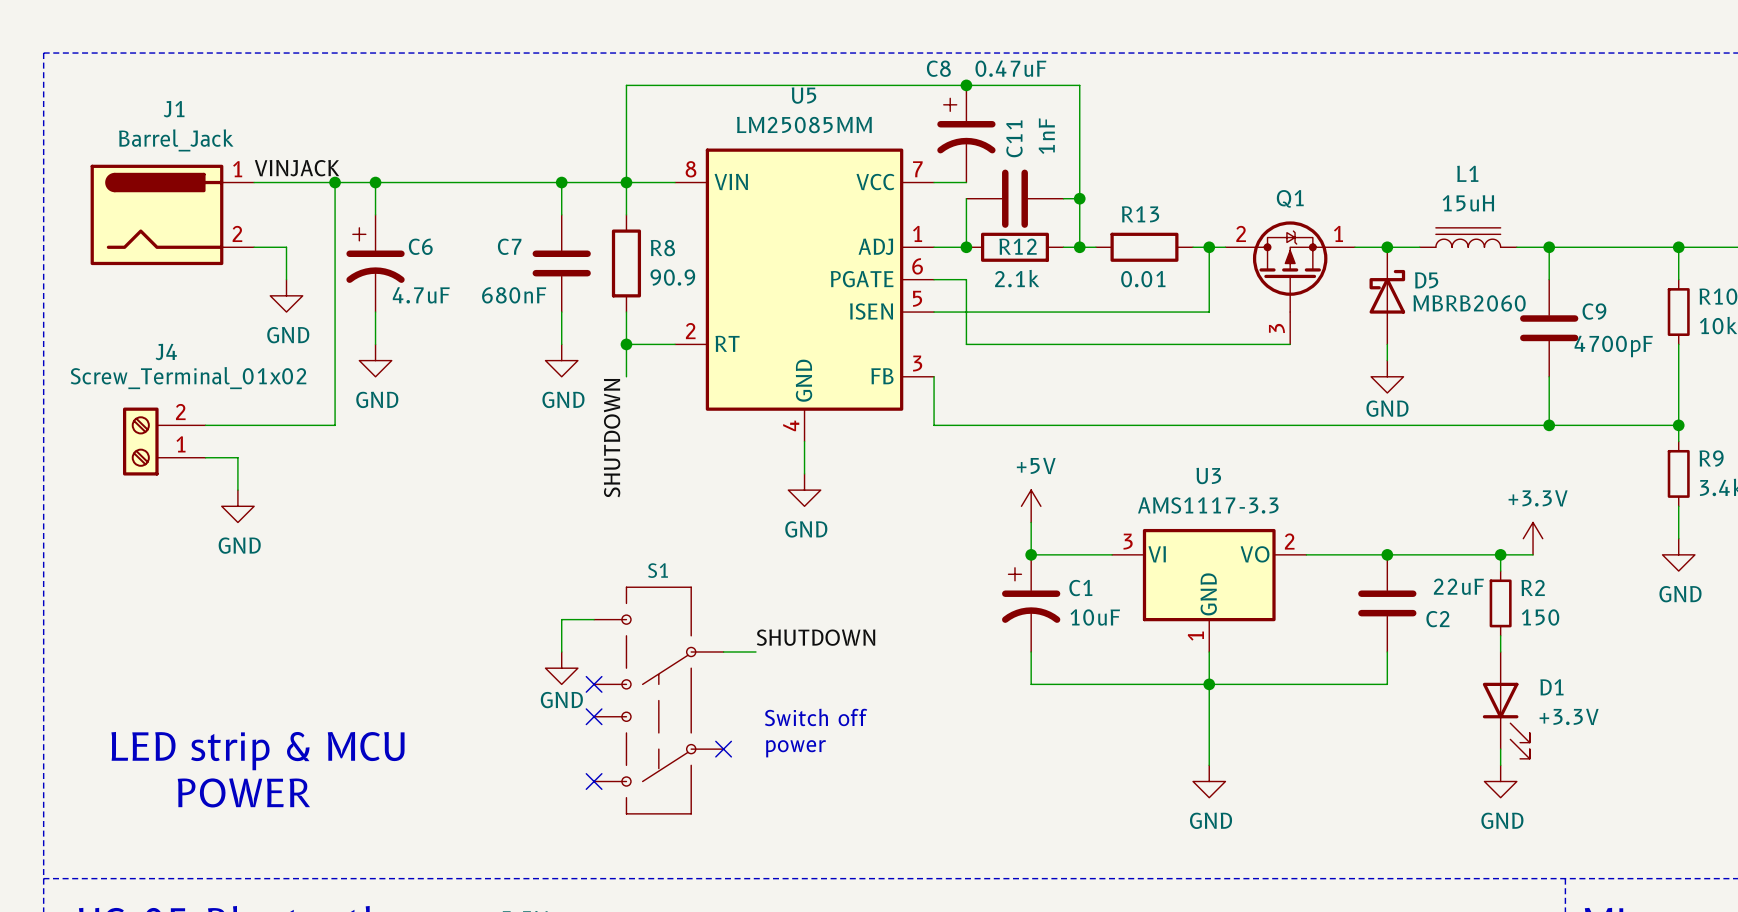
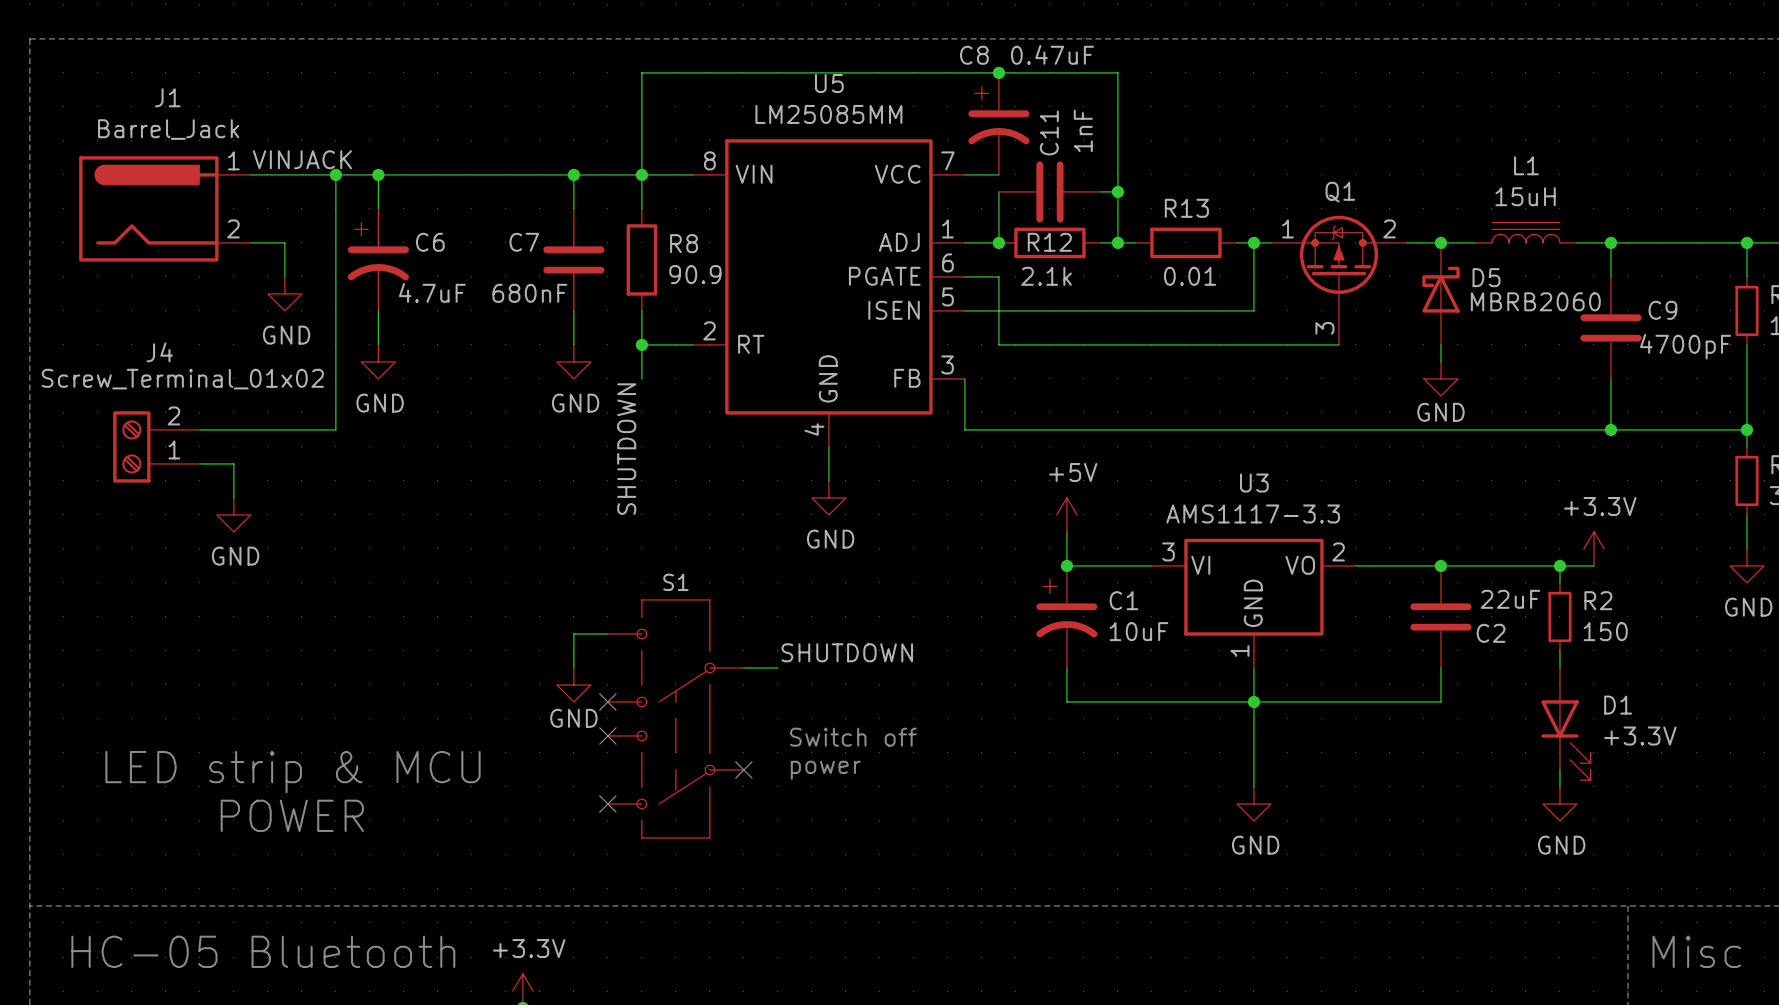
Q1 flip: as is (1290, 266) -> left-right (1338, 263)

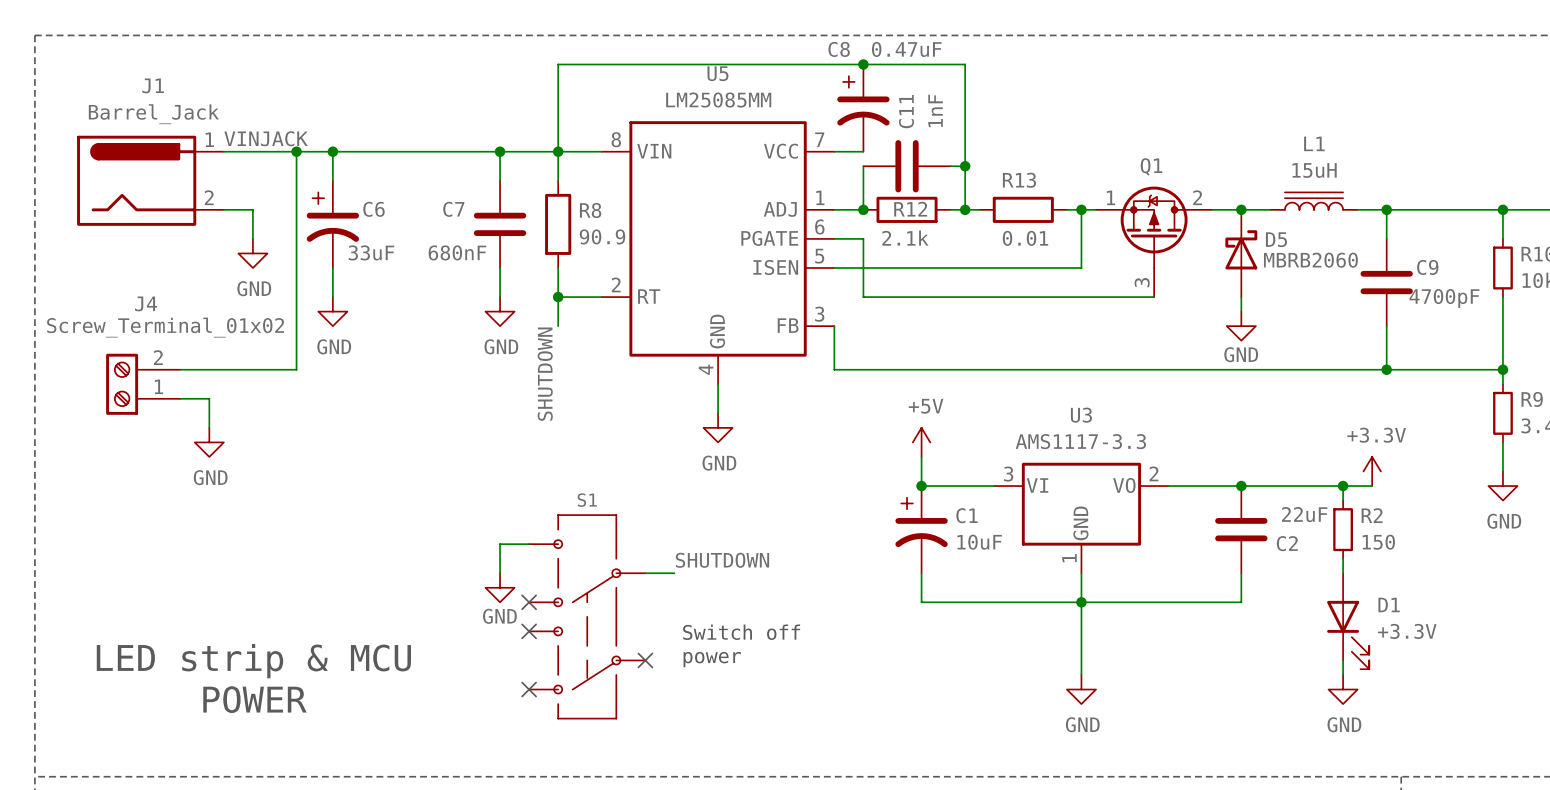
C6 value: 4.7uF (432, 292) -> 33uF (371, 252)

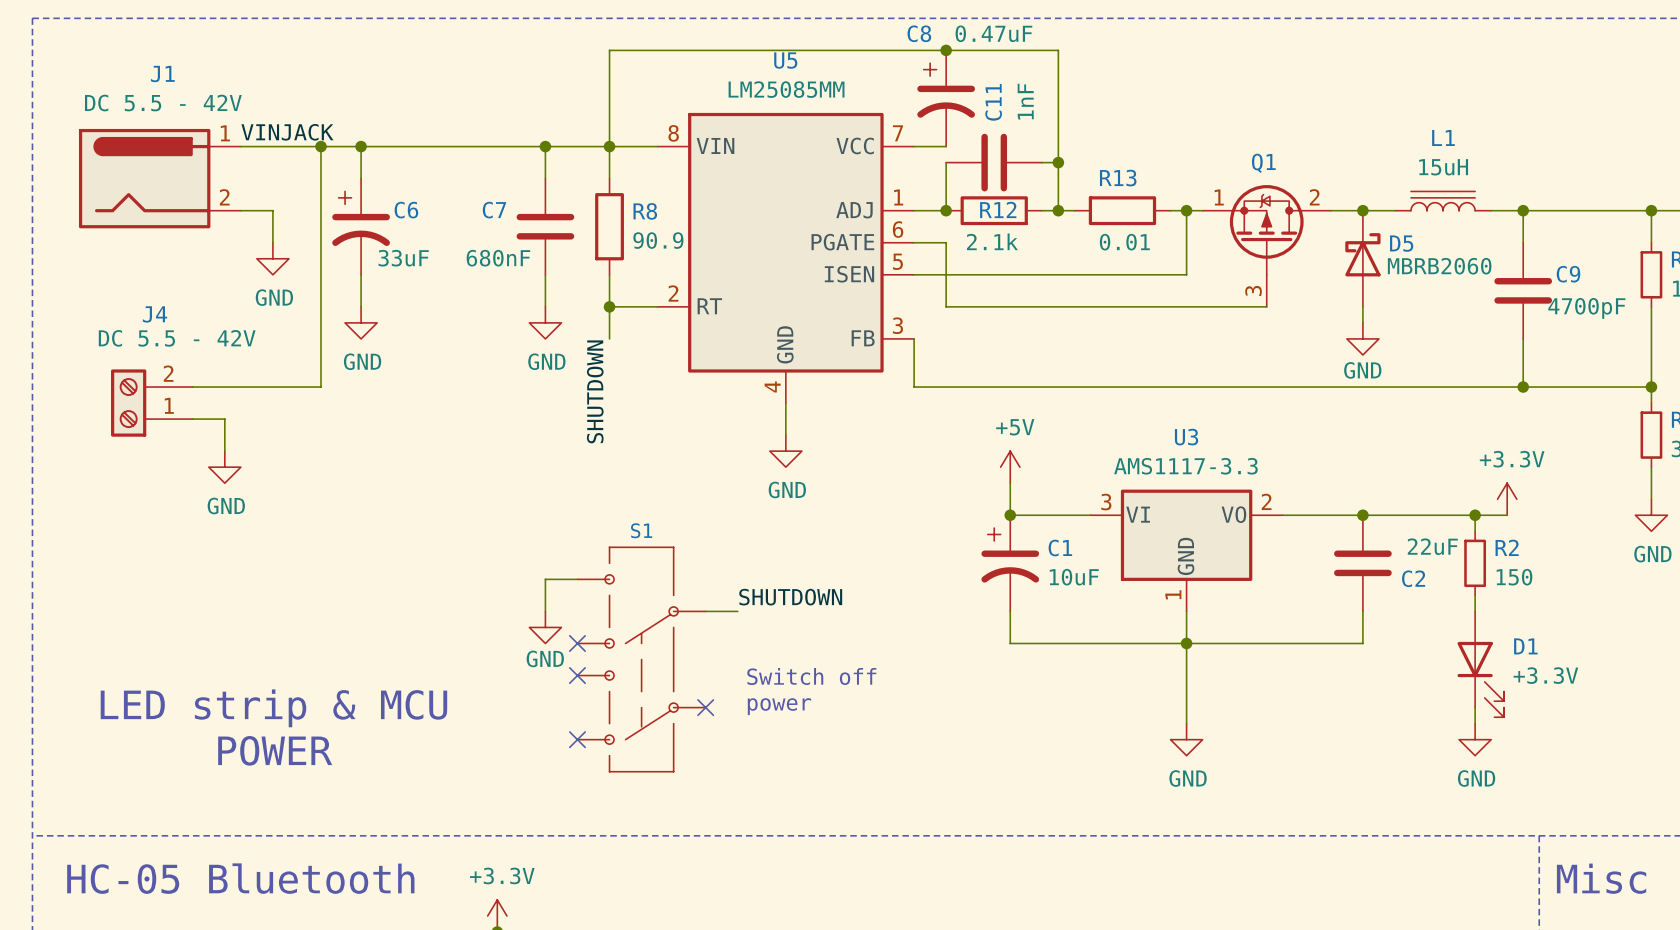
J1 value: Barrel_Jack (153, 114) -> DC 5.5 - 42V (163, 103)
J4 value: Screw_Terminal_01x02 (165, 327) -> DC 5.5 - 42V (177, 338)

